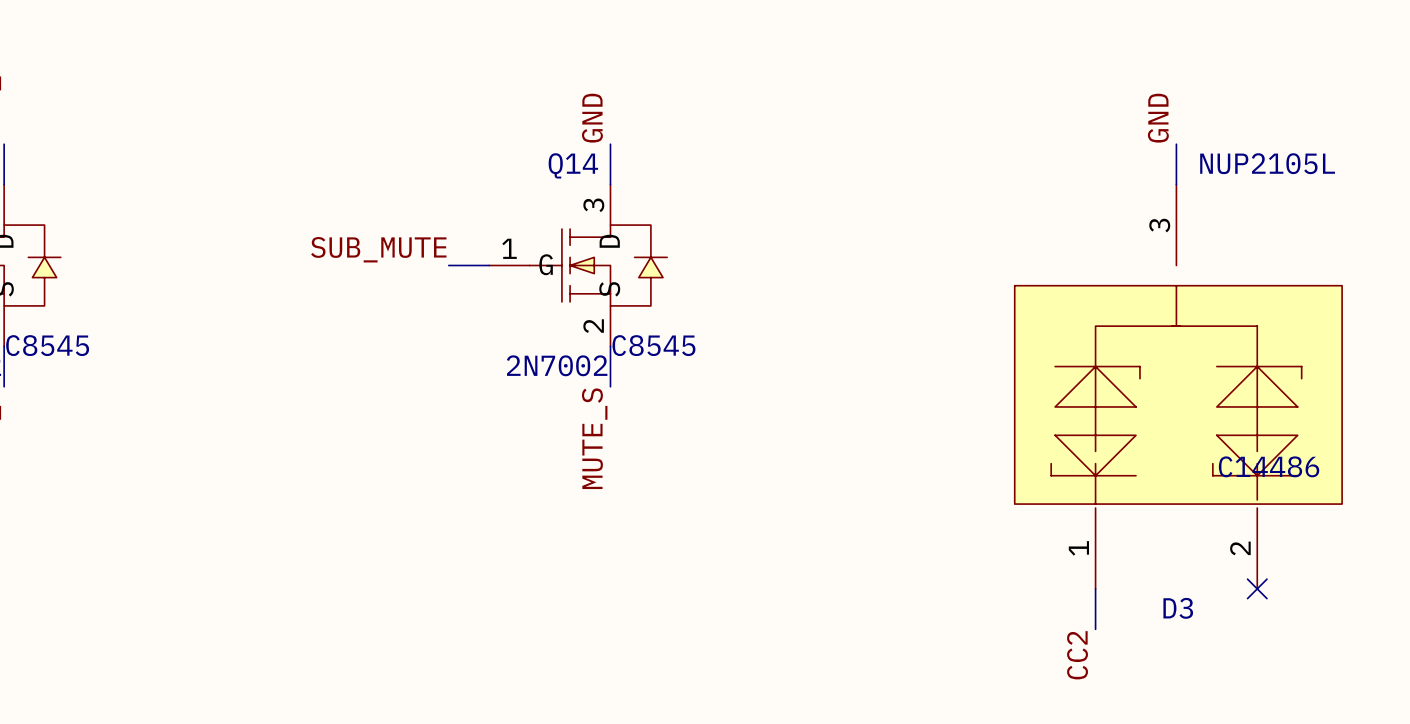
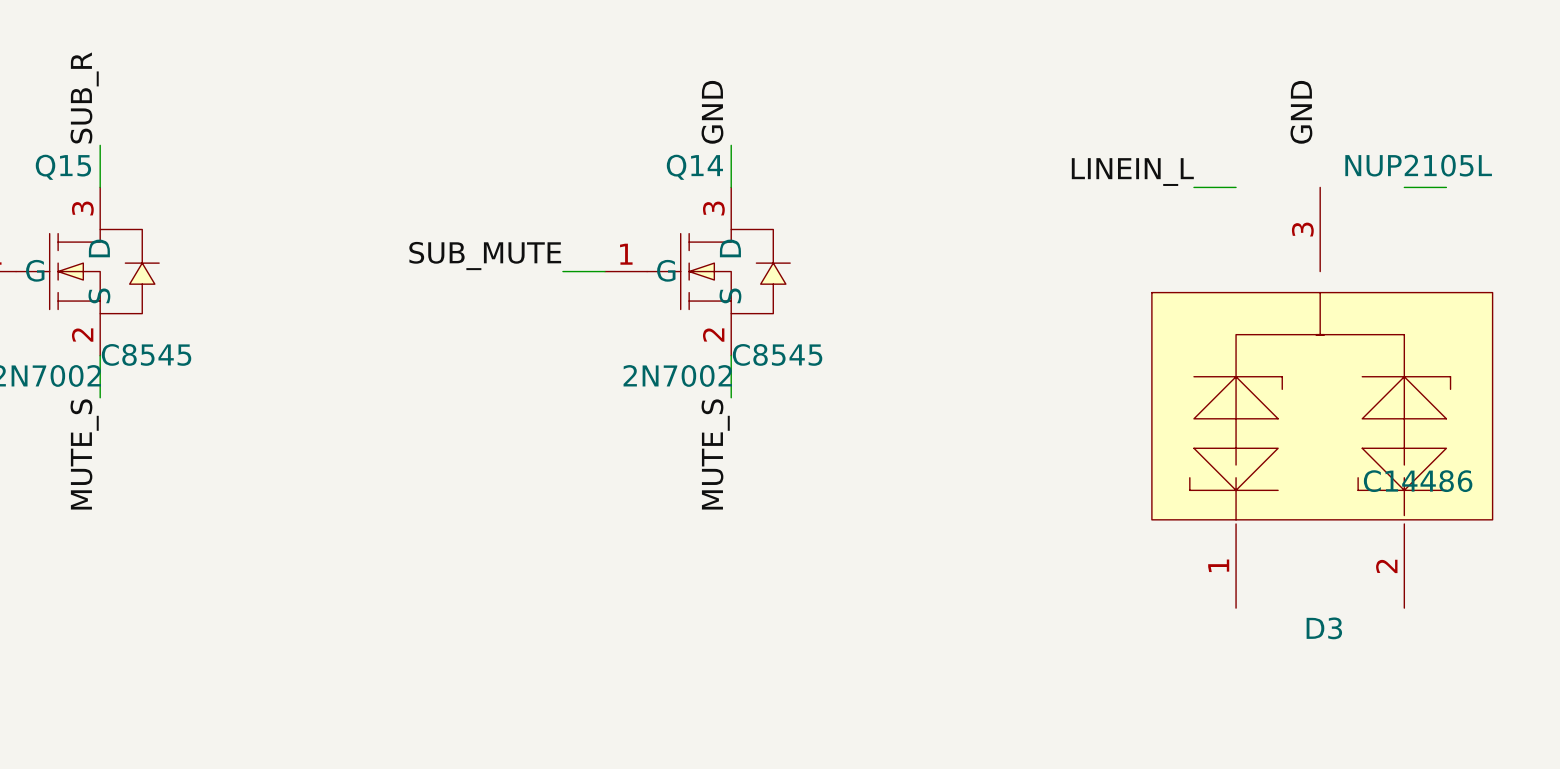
wire: (1176, 144) (1176, 184) -> none
label: none -> LINEIN_L (1132, 172)
wire: none -> (1193, 187) (1236, 187)
wire: none -> (1404, 187) (1446, 187)
wire: (1095, 588) (1095, 629) -> none
no-connect mark: (1257, 588) -> none
label: CC2 (1077, 655) -> none

